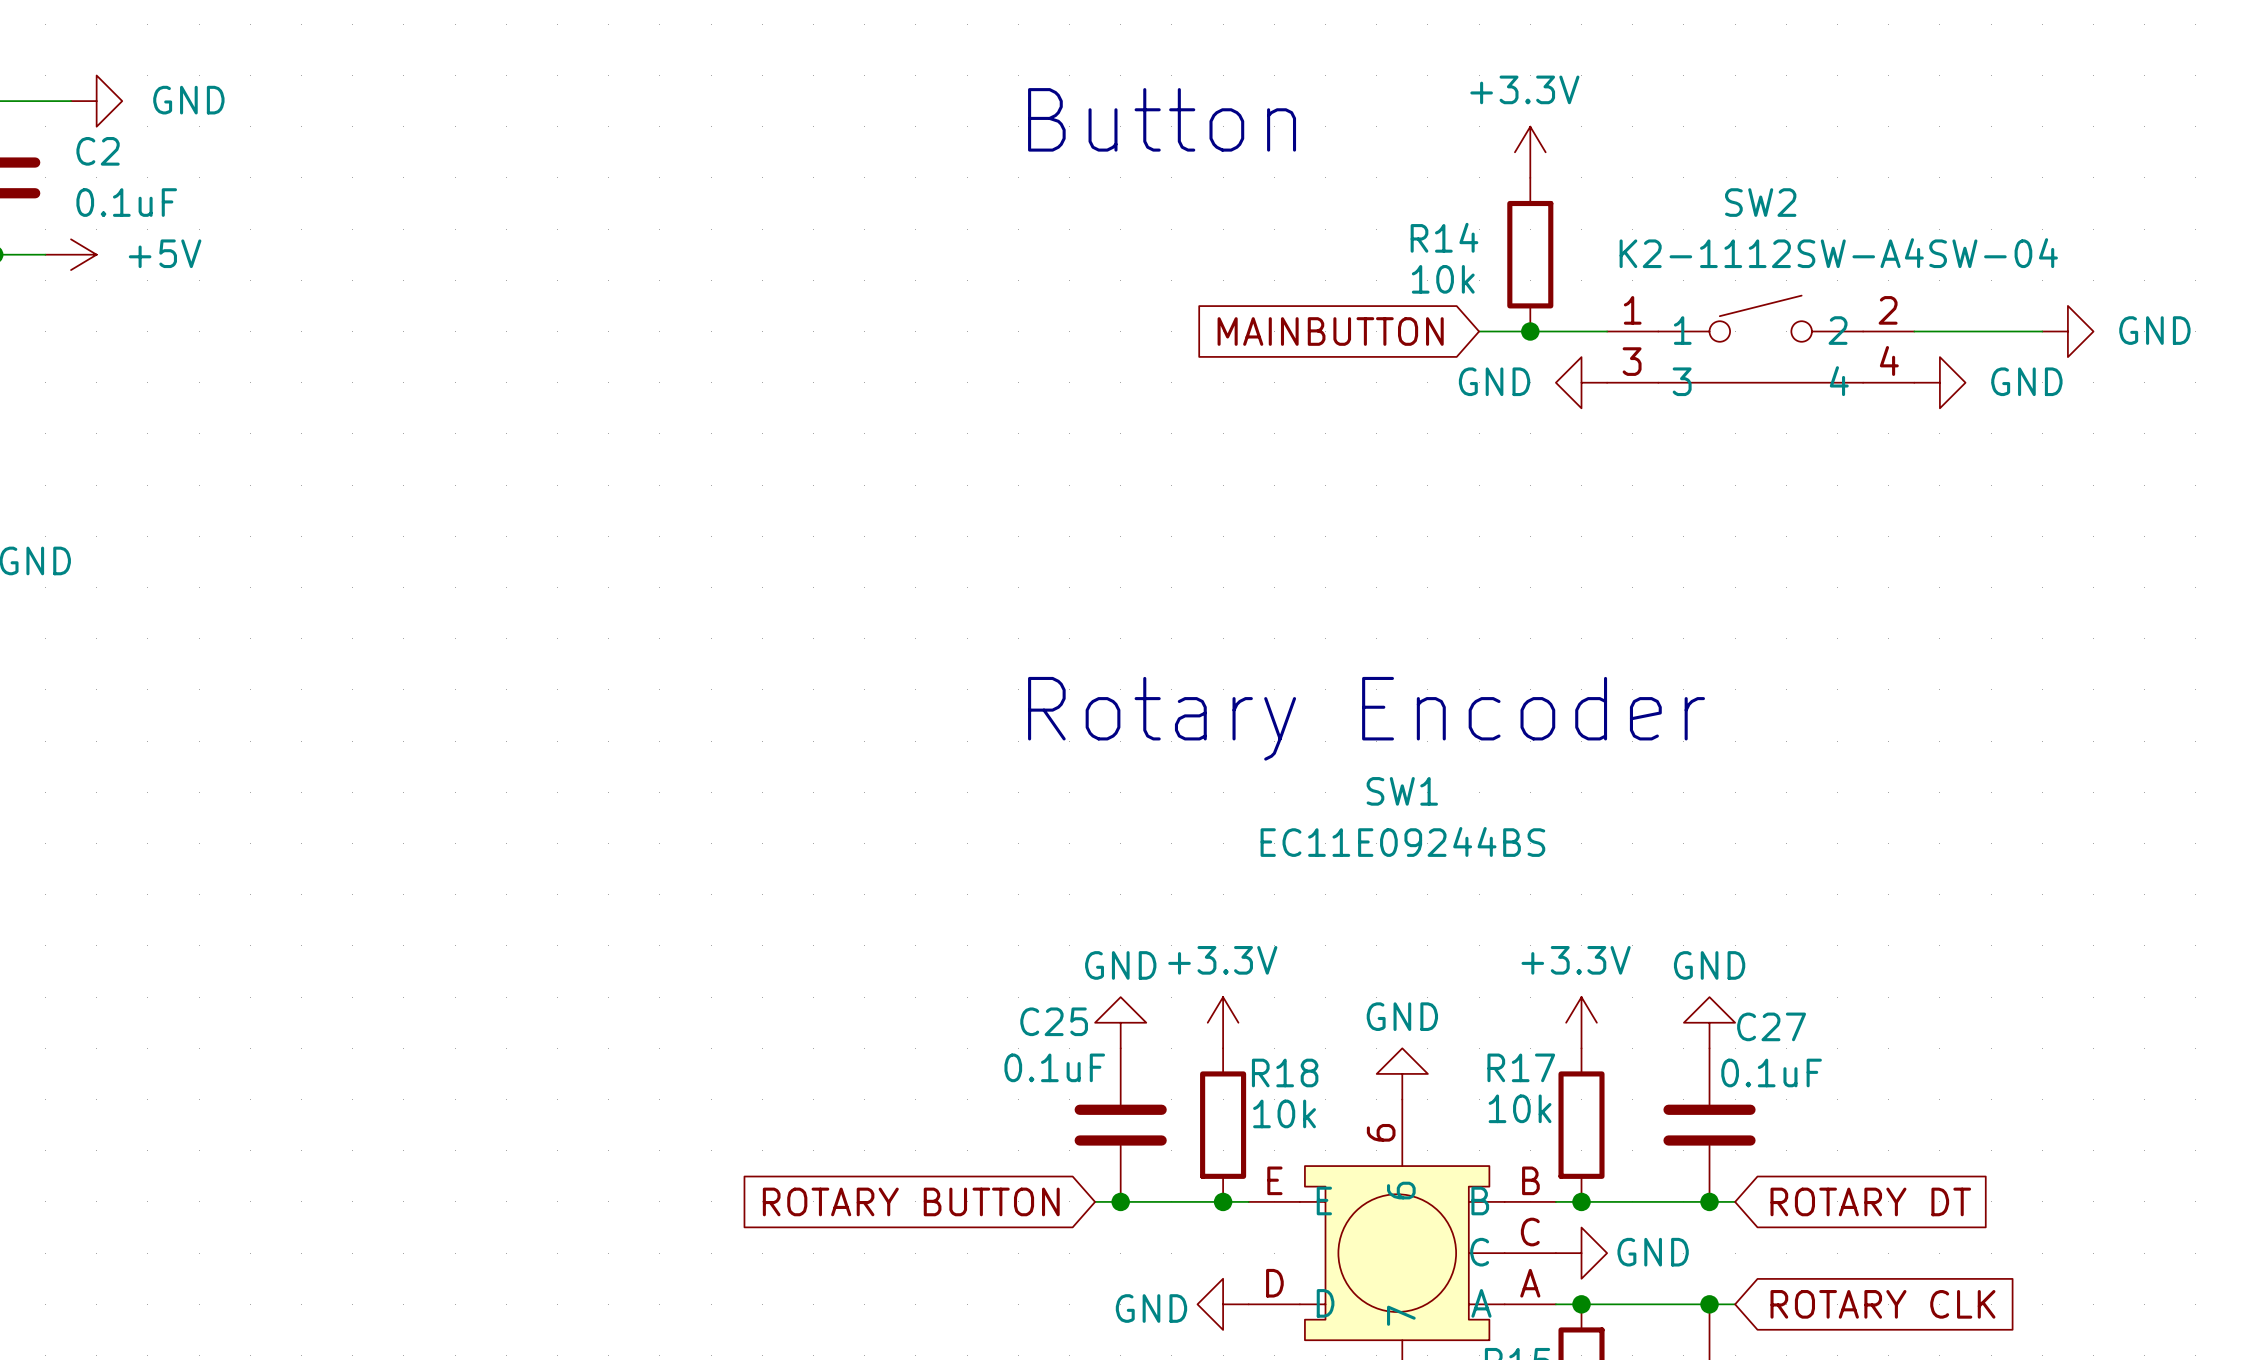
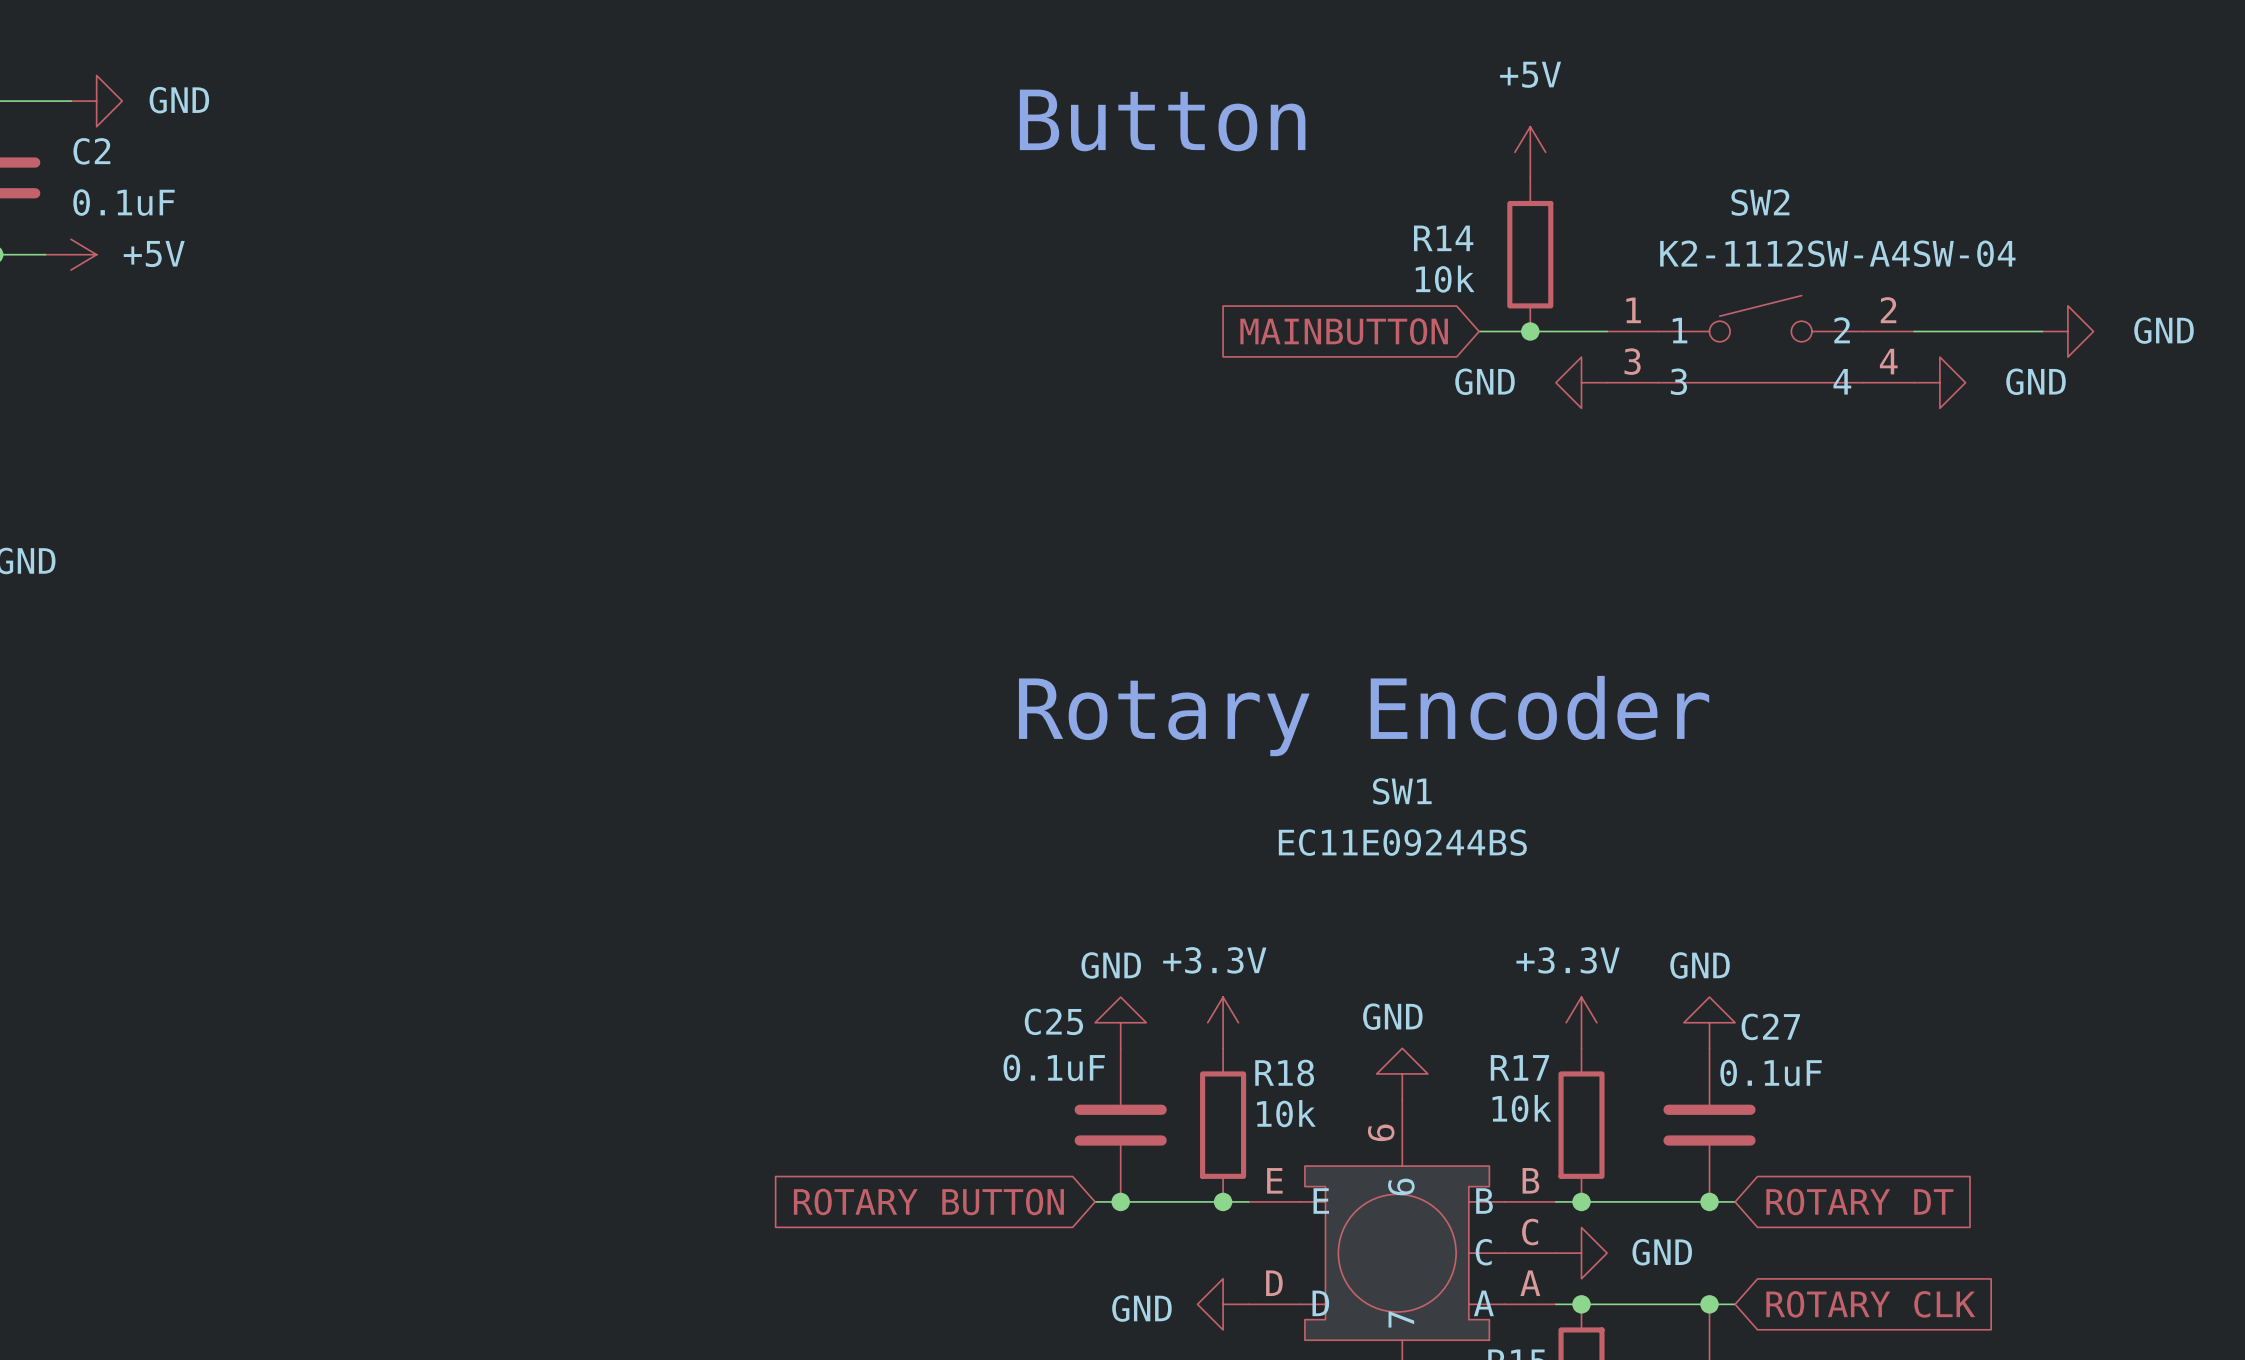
power symbol: +3.3V (1530, 152) -> +5V (1530, 152)

